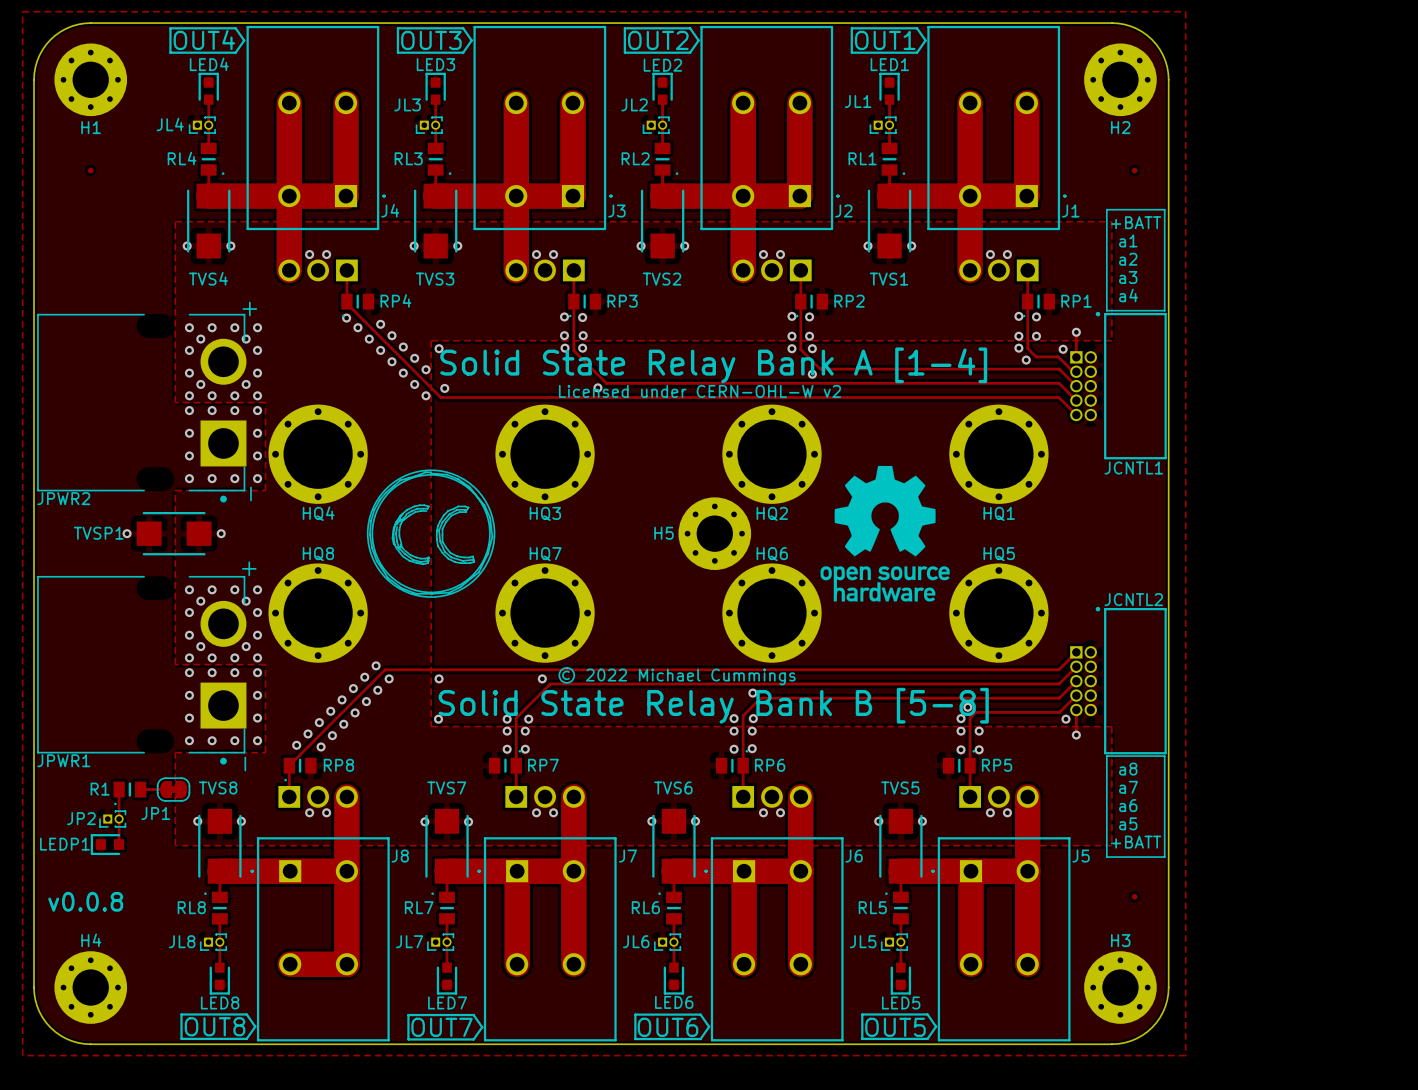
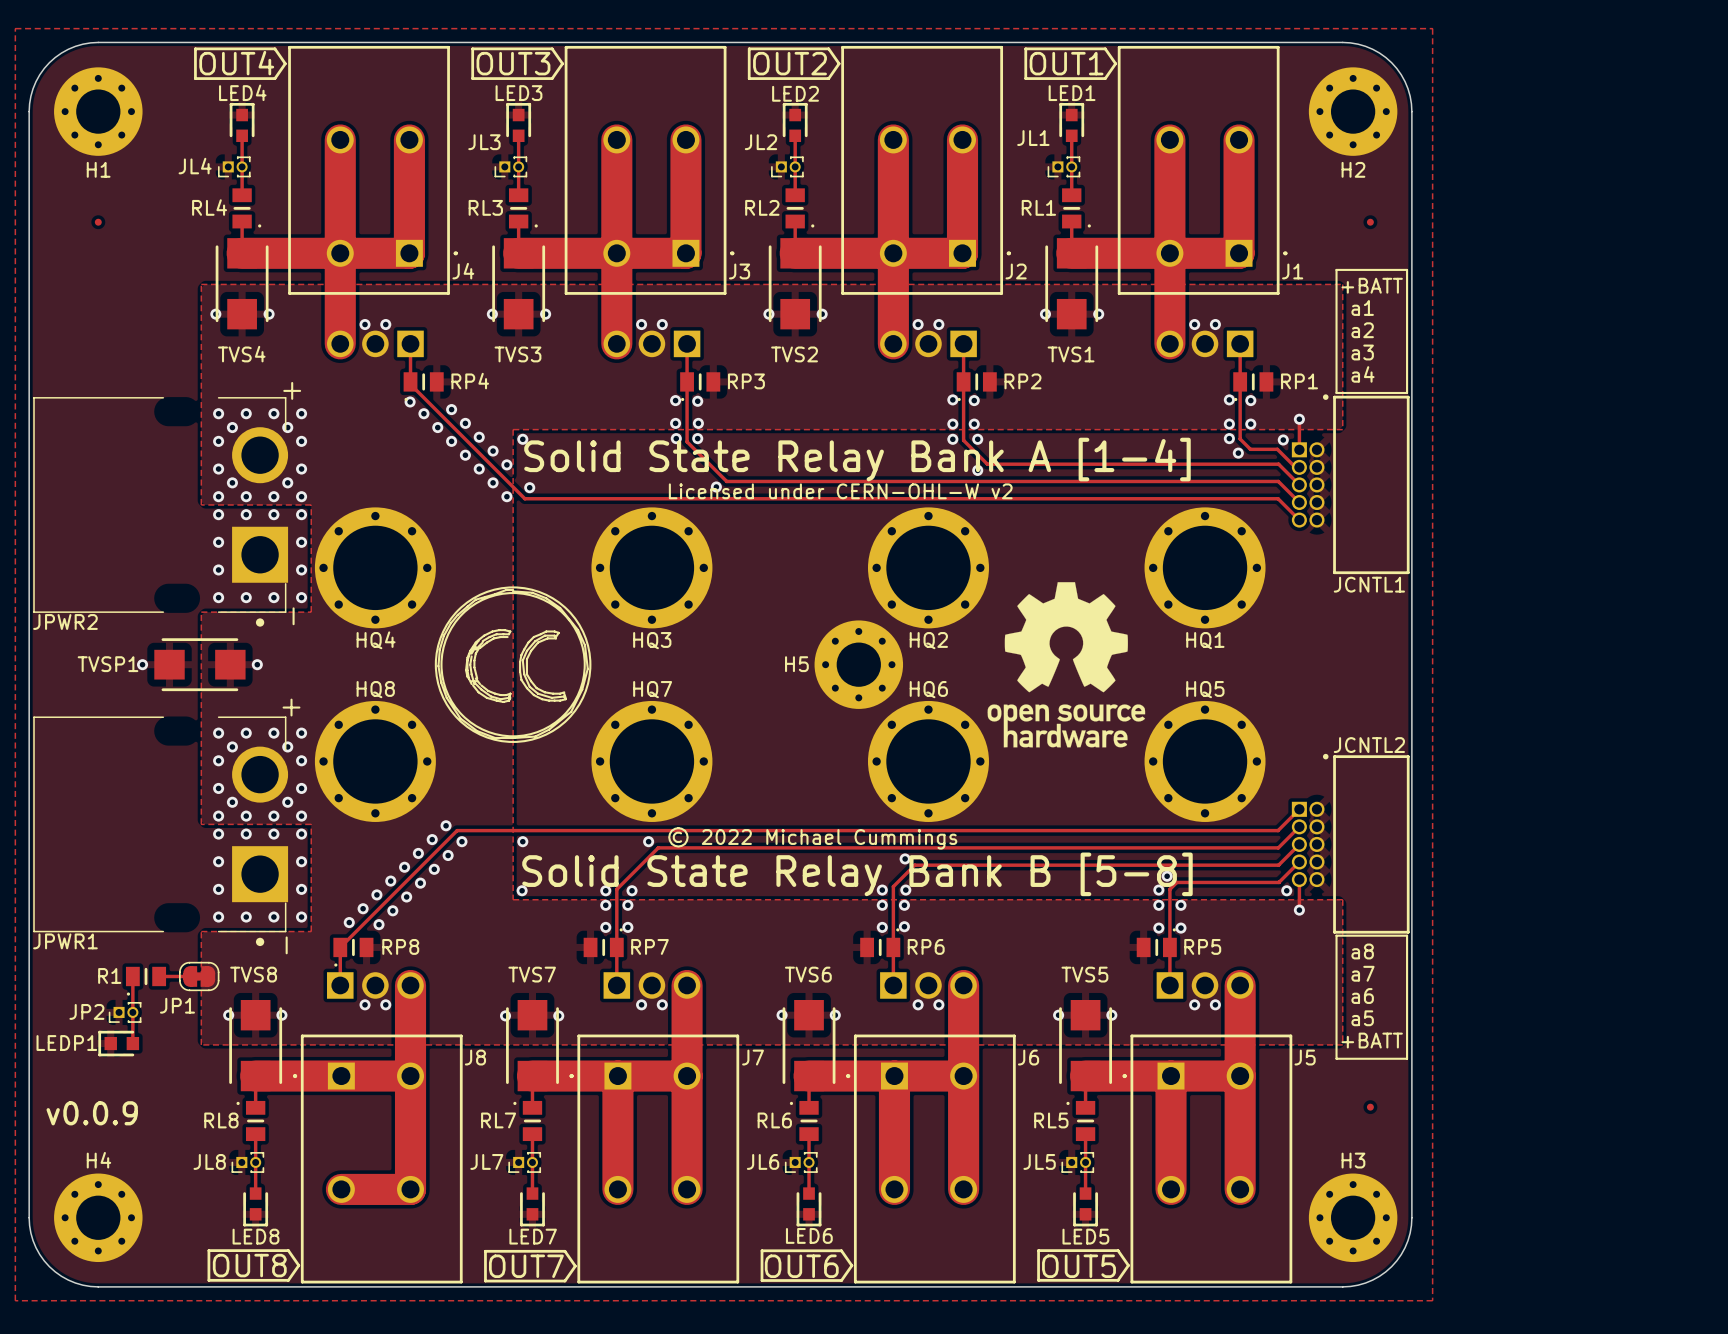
text: v0.0.8 (85, 901) -> v0.0.9 (92, 1113)

